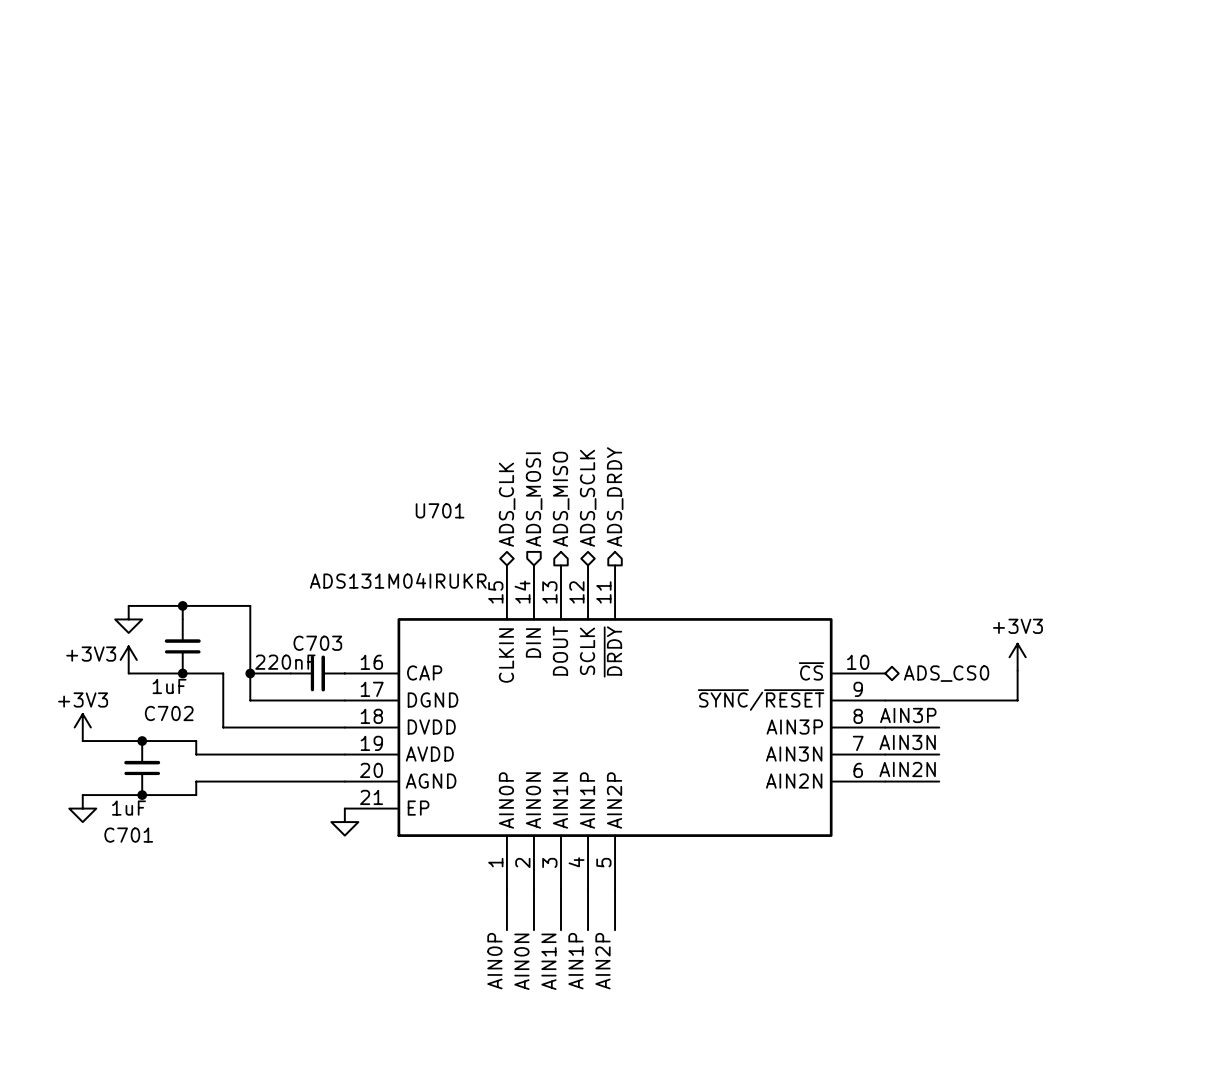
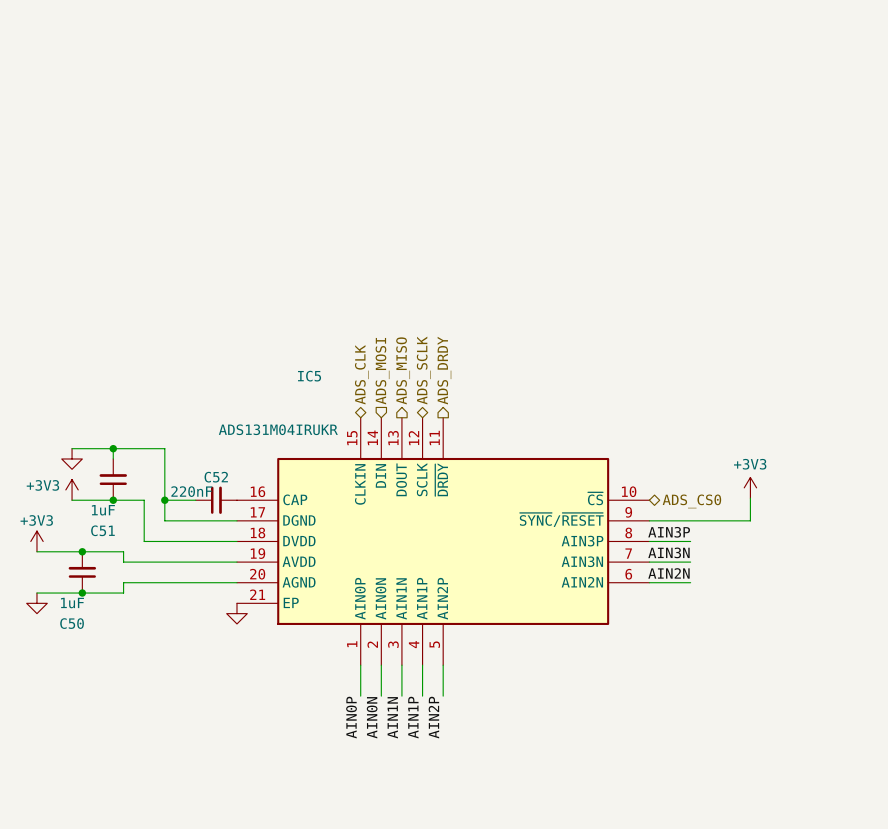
U701 name: U701 (440, 510) -> IC5 (309, 376)
C703 name: C703 (317, 643) -> C52 (216, 477)
C702 name: C702 (169, 713) -> C51 (102, 530)
C701 name: C701 (128, 835) -> C50 (72, 623)

